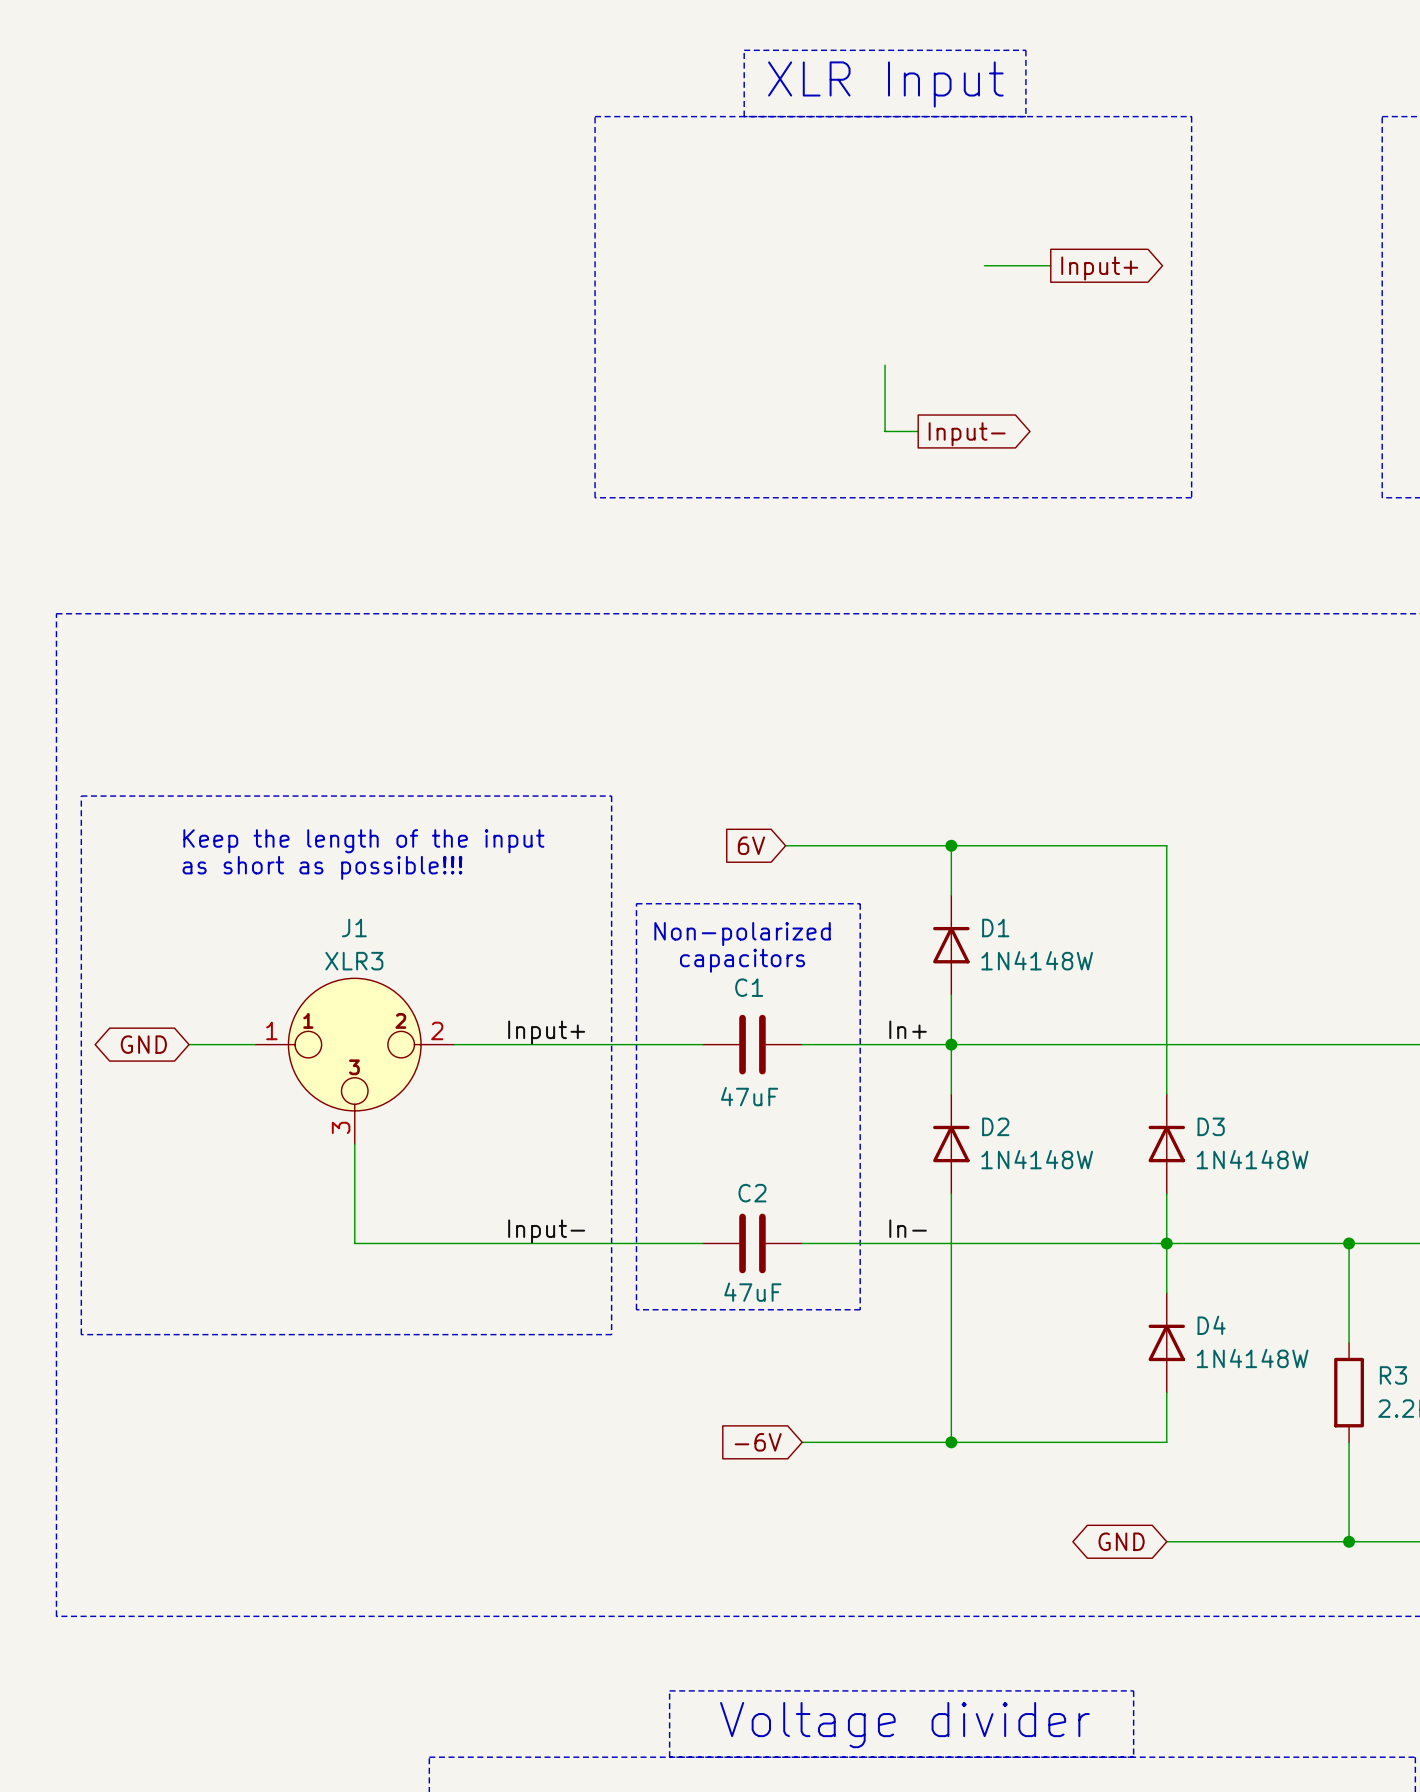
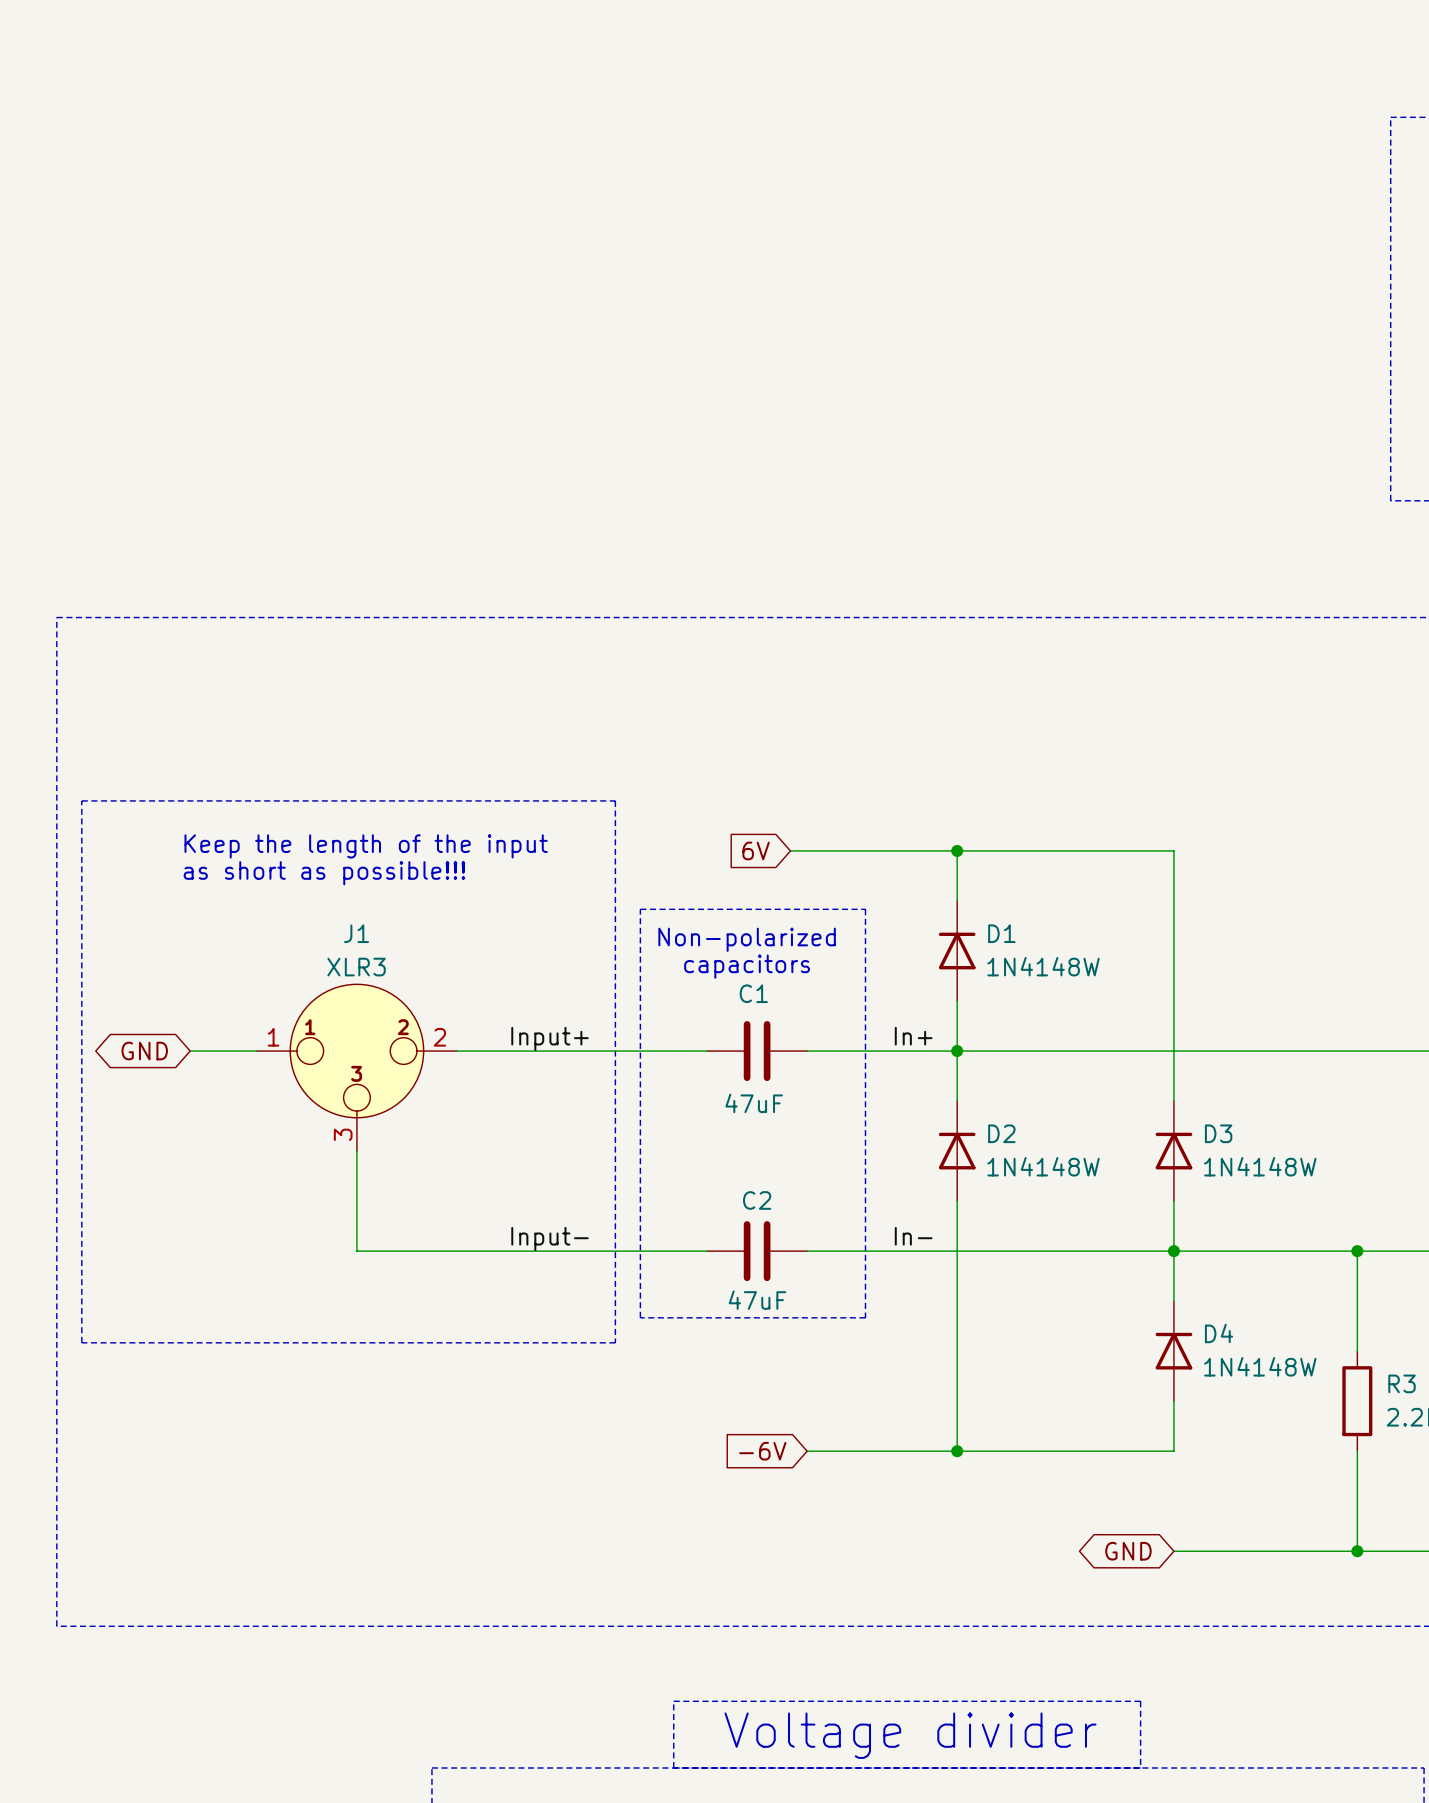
text: XLR Input (885, 84) -> none
line: (595, 116) (1191, 116) (1191, 497) (595, 497) (595, 116) -> none
line: (744, 116) (744, 50) (1025, 50) (1025, 116) -> none
wire: (984, 265) (1050, 265) -> none
global label: Input+ (1099, 268) -> none
wire: (885, 365) (885, 431) (918, 431) -> none
global label: Input- (967, 434) -> none

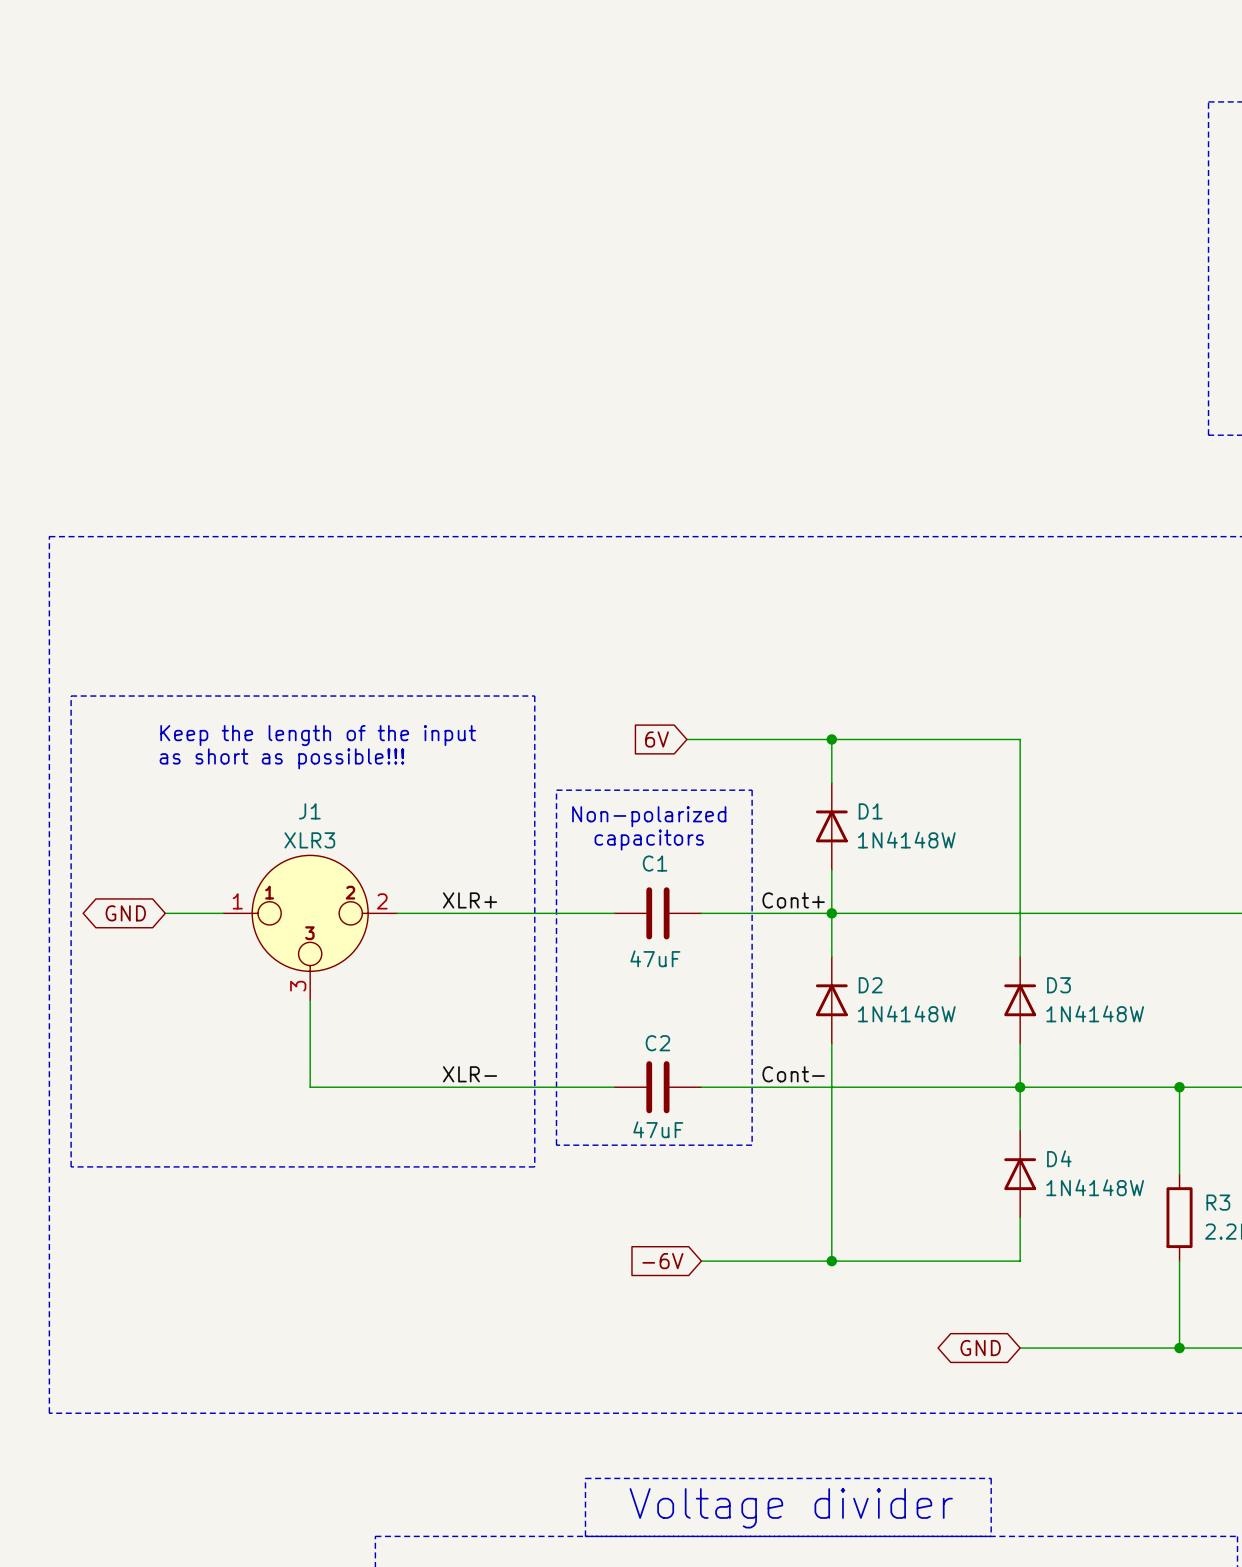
label: In+ (913, 1036) -> none
label: none -> Cont+ (793, 900)
label: Input+ (550, 1038) -> XLR+ (470, 900)
label: In- (913, 1236) -> none
label: none -> Cont- (793, 1074)
label: Input- (550, 1239) -> XLR- (470, 1074)

